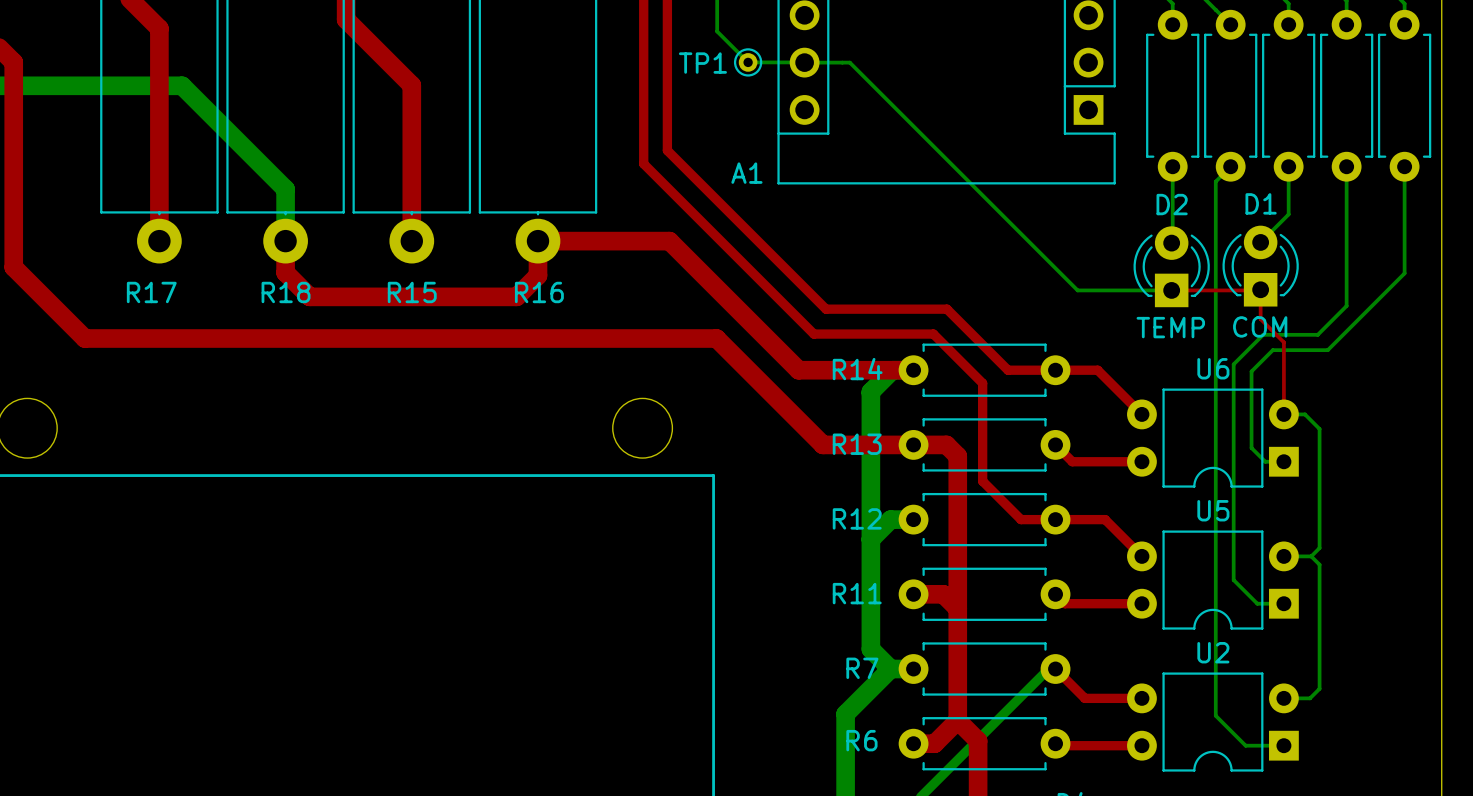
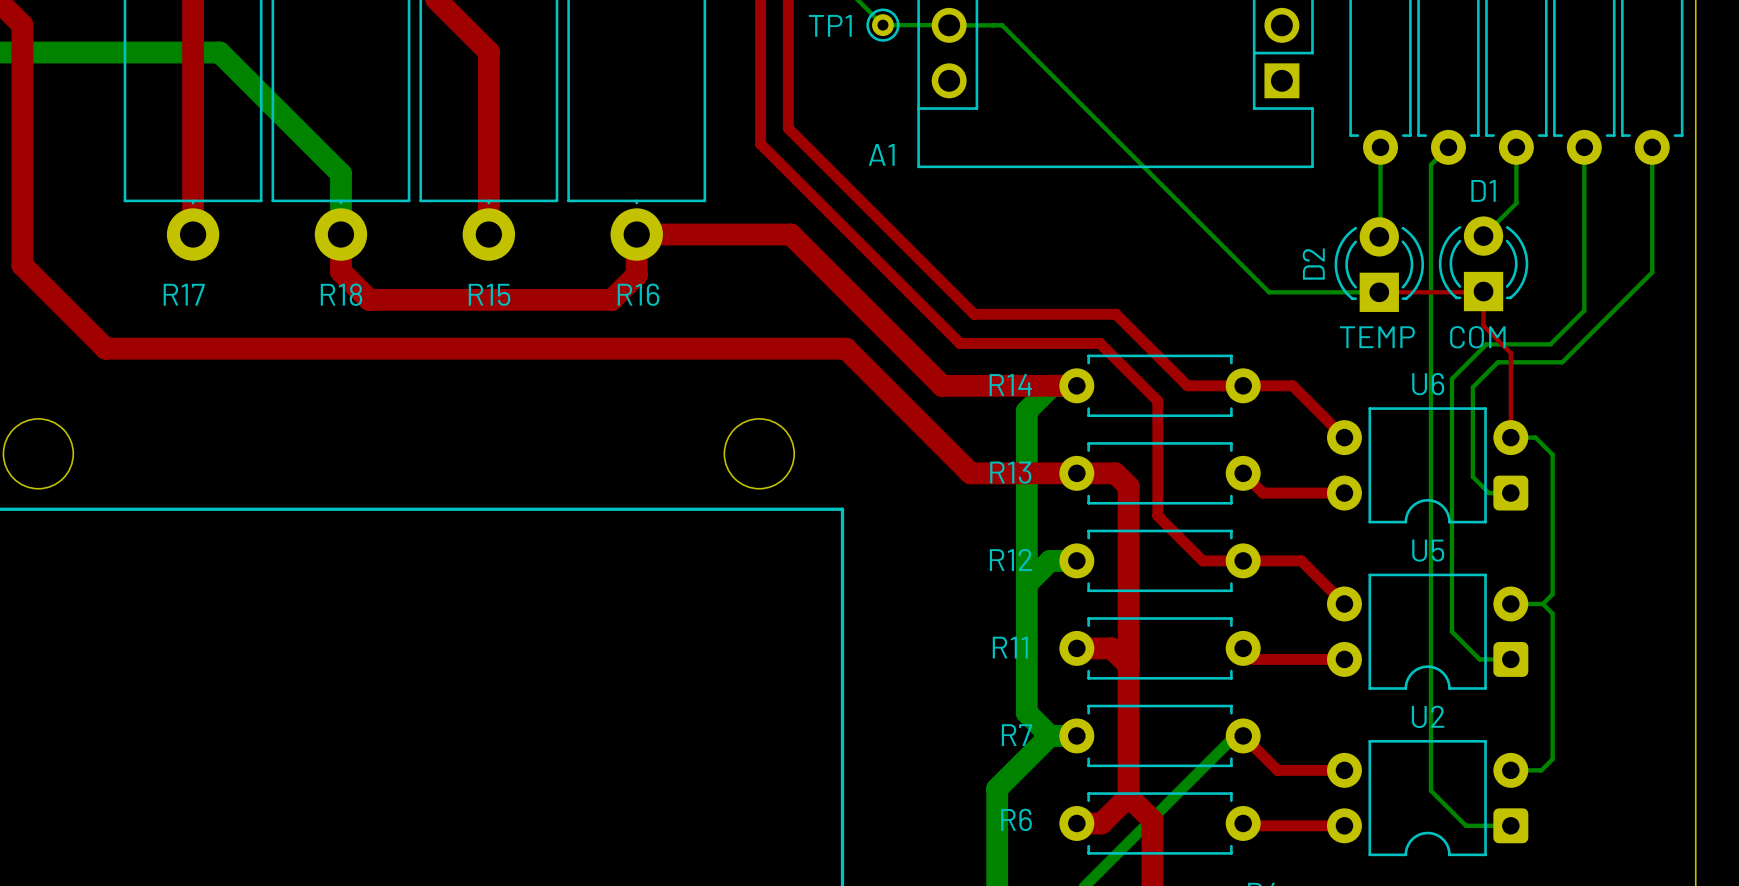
D2 name rotation: 0° (1172, 204) -> 90° counterclockwise (1313, 264)
D2 name position: D2 (1172, 204) -> D2 (1313, 264)
D1 value: COM (1260, 326) -> none
D2 value: TEMP (1170, 327) -> none
text: none -> TEMP (1377, 337)
text: none -> COM (1477, 337)
U6 footprint: [1127, 388, 1299, 488] -> [1327, 407, 1529, 524]
U5 footprint: [1127, 530, 1299, 630] -> [1327, 573, 1529, 690]
U2 footprint: [1127, 672, 1299, 772] -> [1327, 740, 1529, 857]

